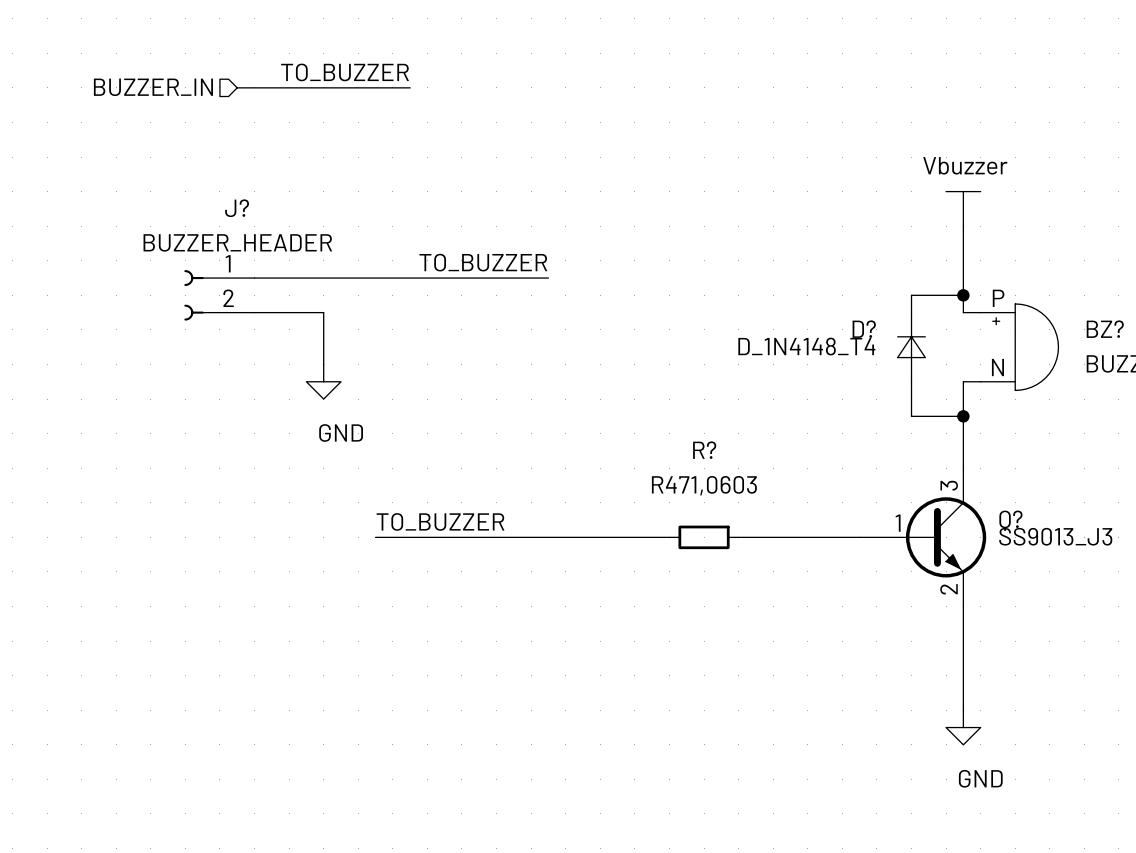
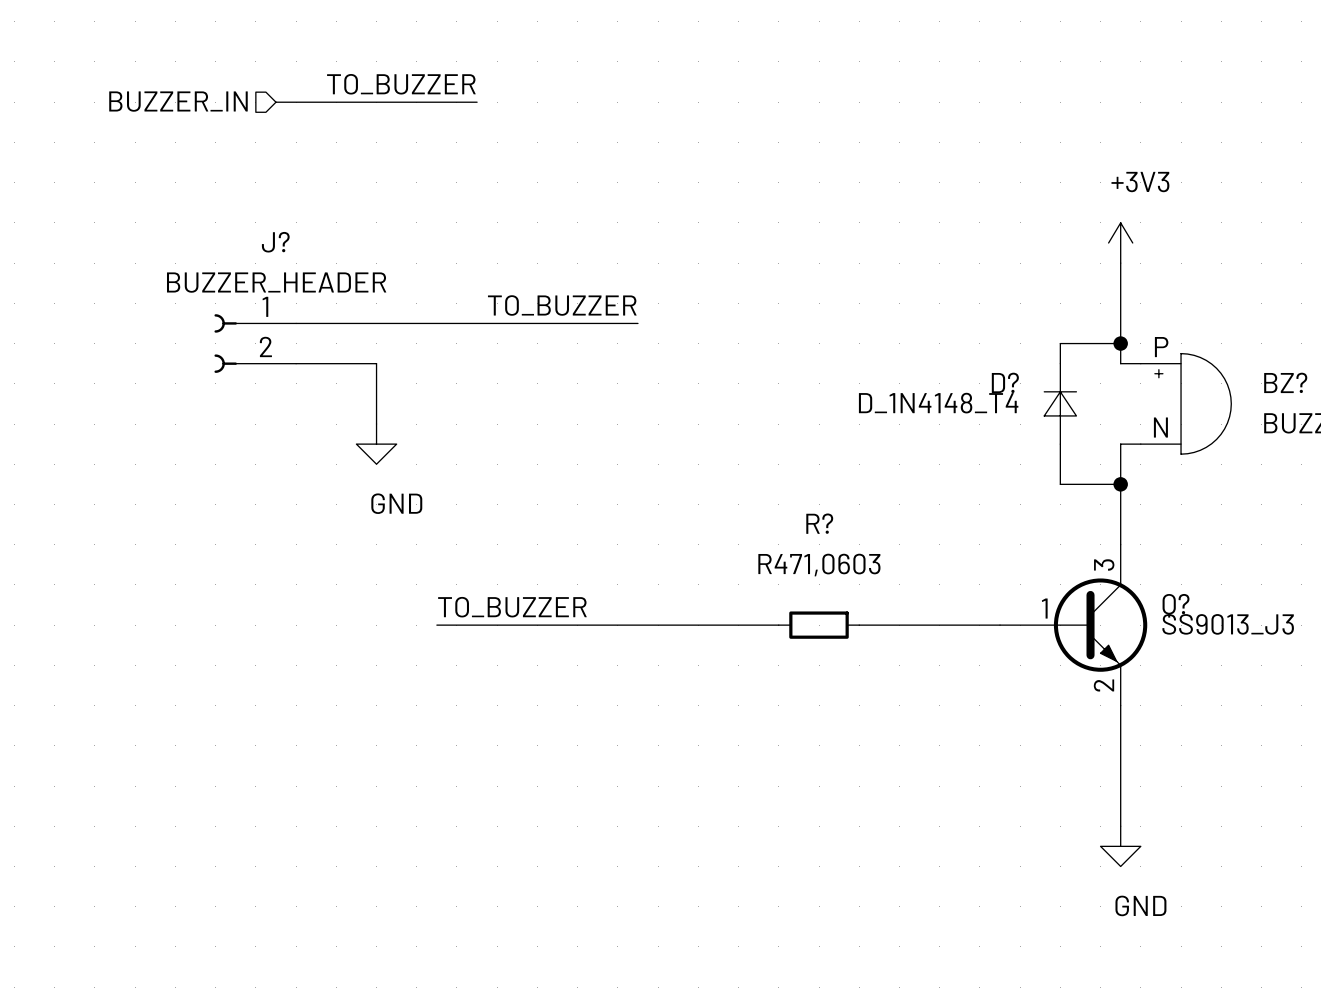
power symbol: Vbuzzer (963, 208) -> +3V3 (1120, 242)

